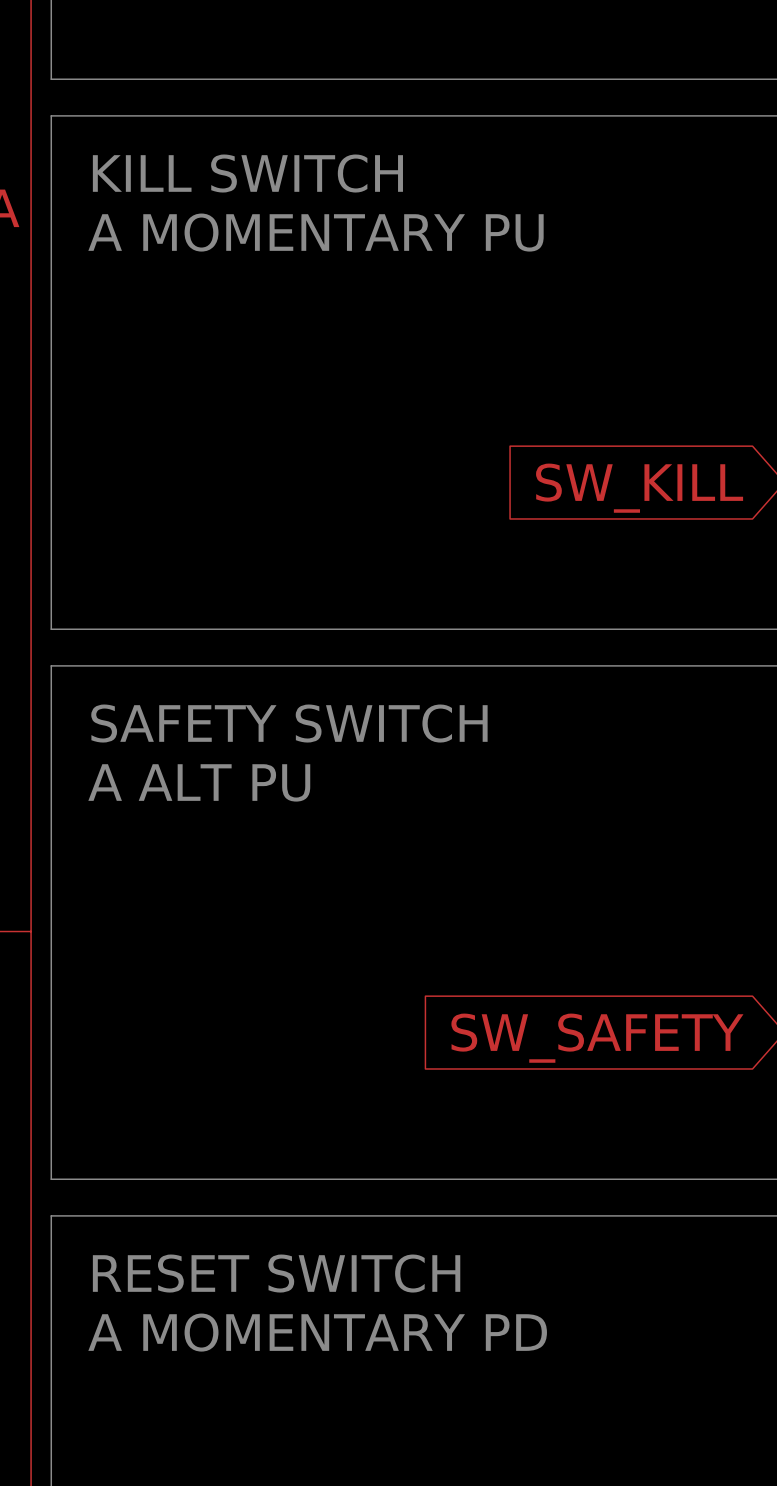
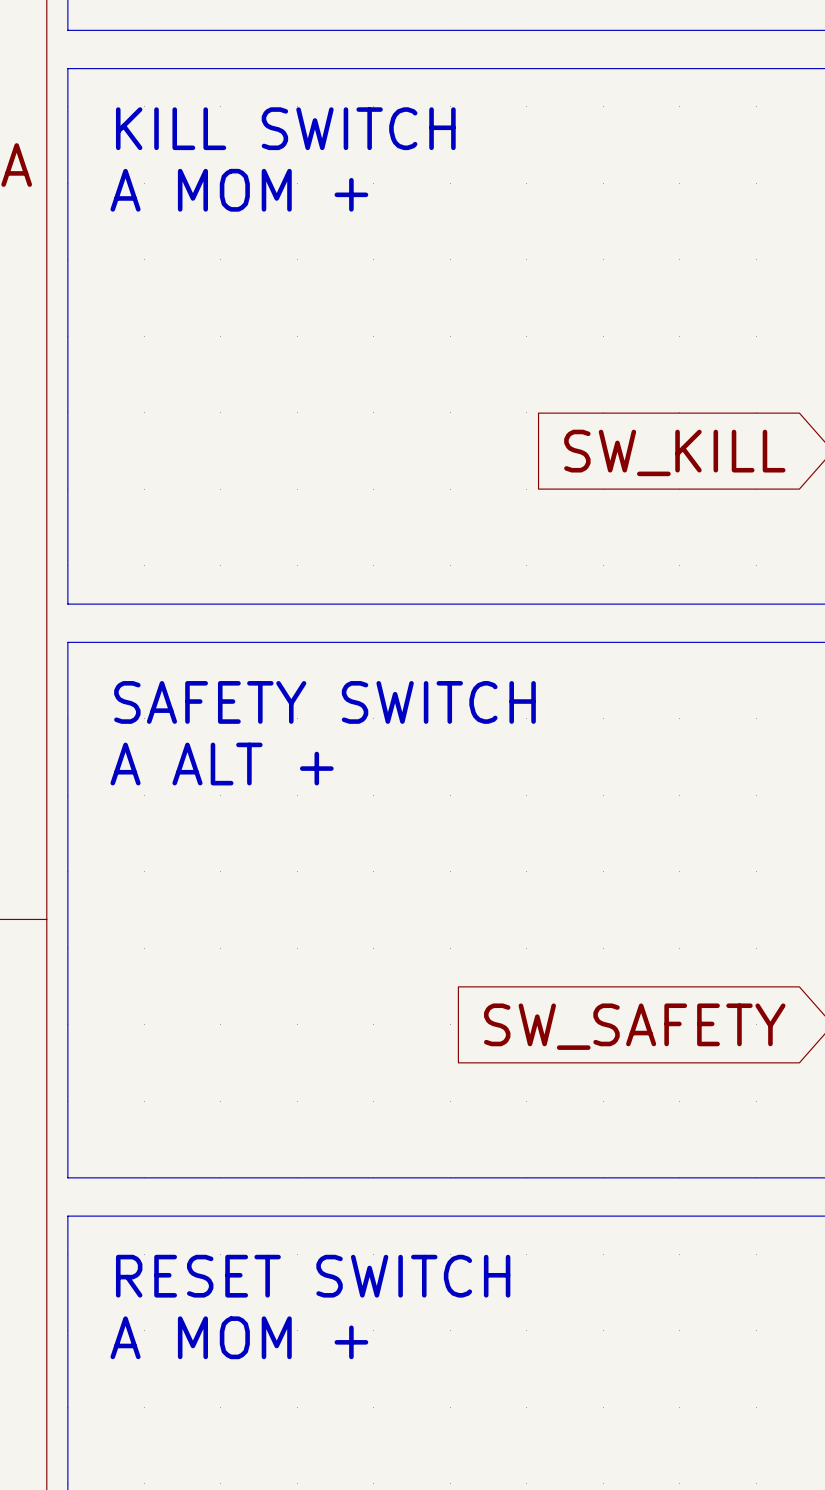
text: A MOMENTARY PU (315, 232) -> A MOM + (239, 190)
text: A ALT PU (199, 782) -> A ALT + (222, 764)
text: A MOMENTARY PD (317, 1332) -> A MOM + (239, 1337)

